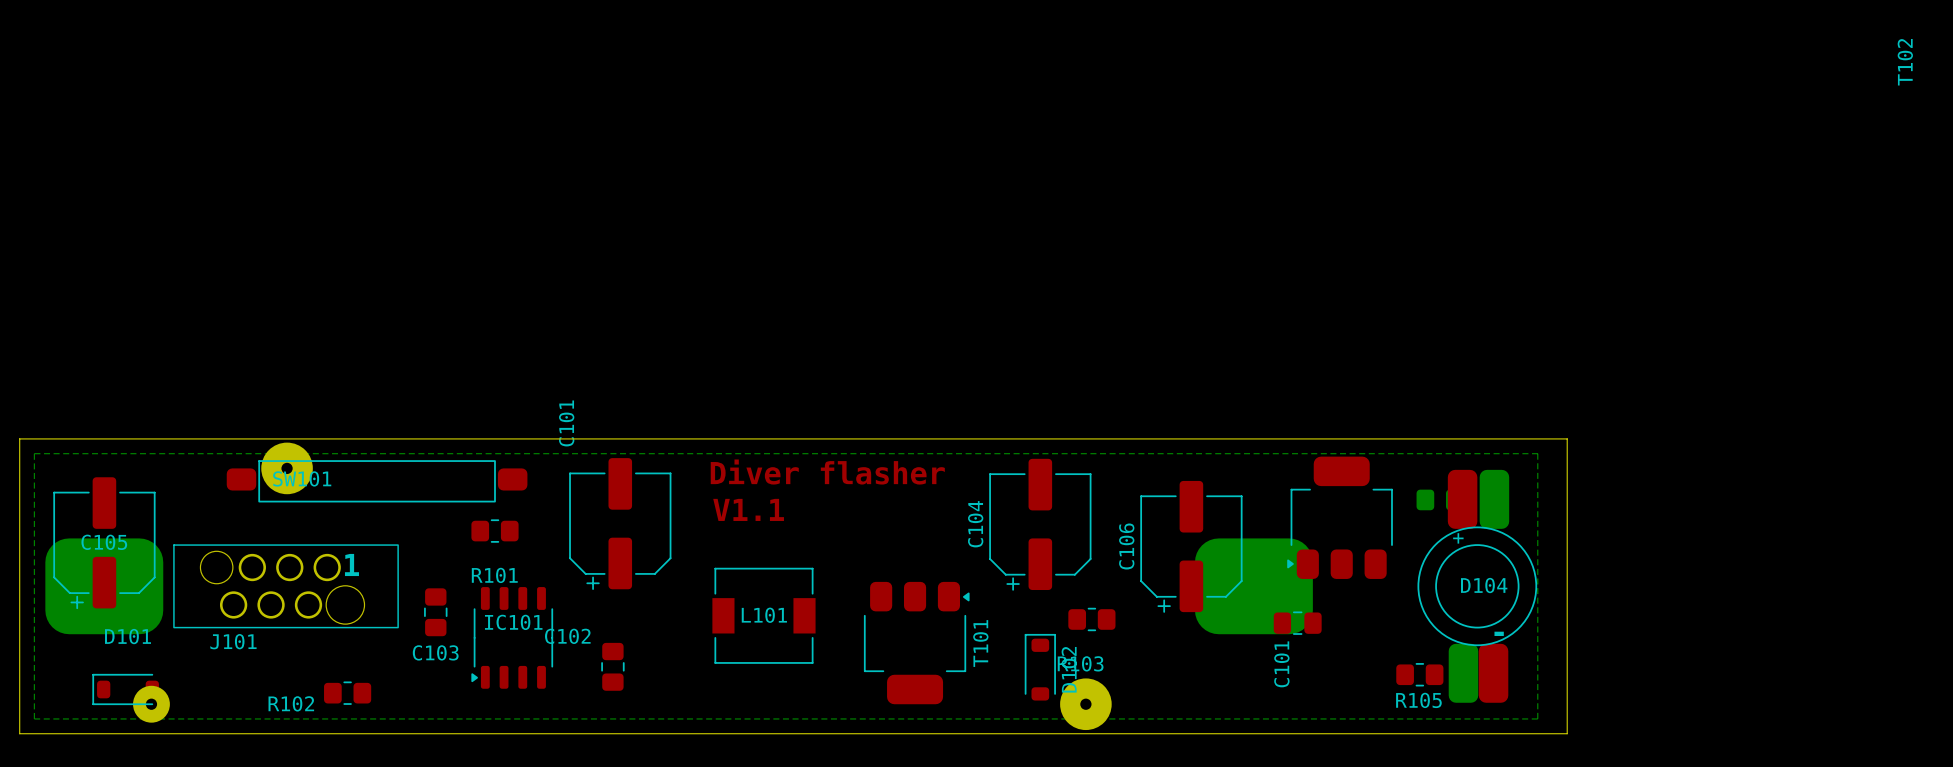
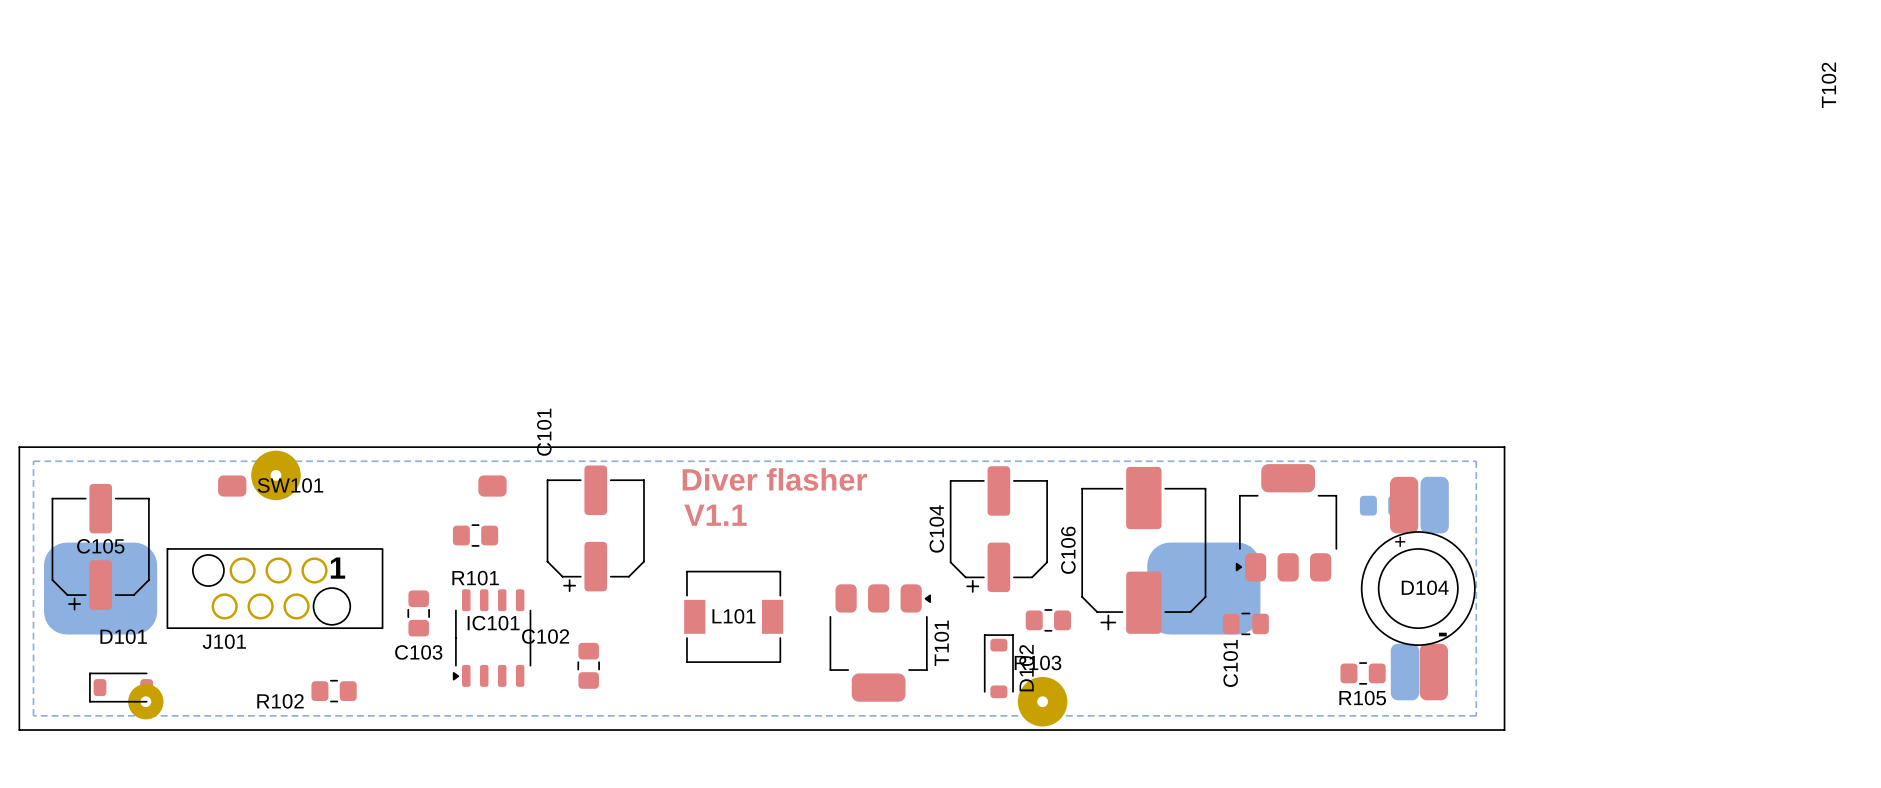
SW101 footprint: [226, 460, 528, 503] -> [218, 475, 507, 497]
C106 footprint: [1140, 480, 1243, 613] -> [1081, 466, 1207, 634]

